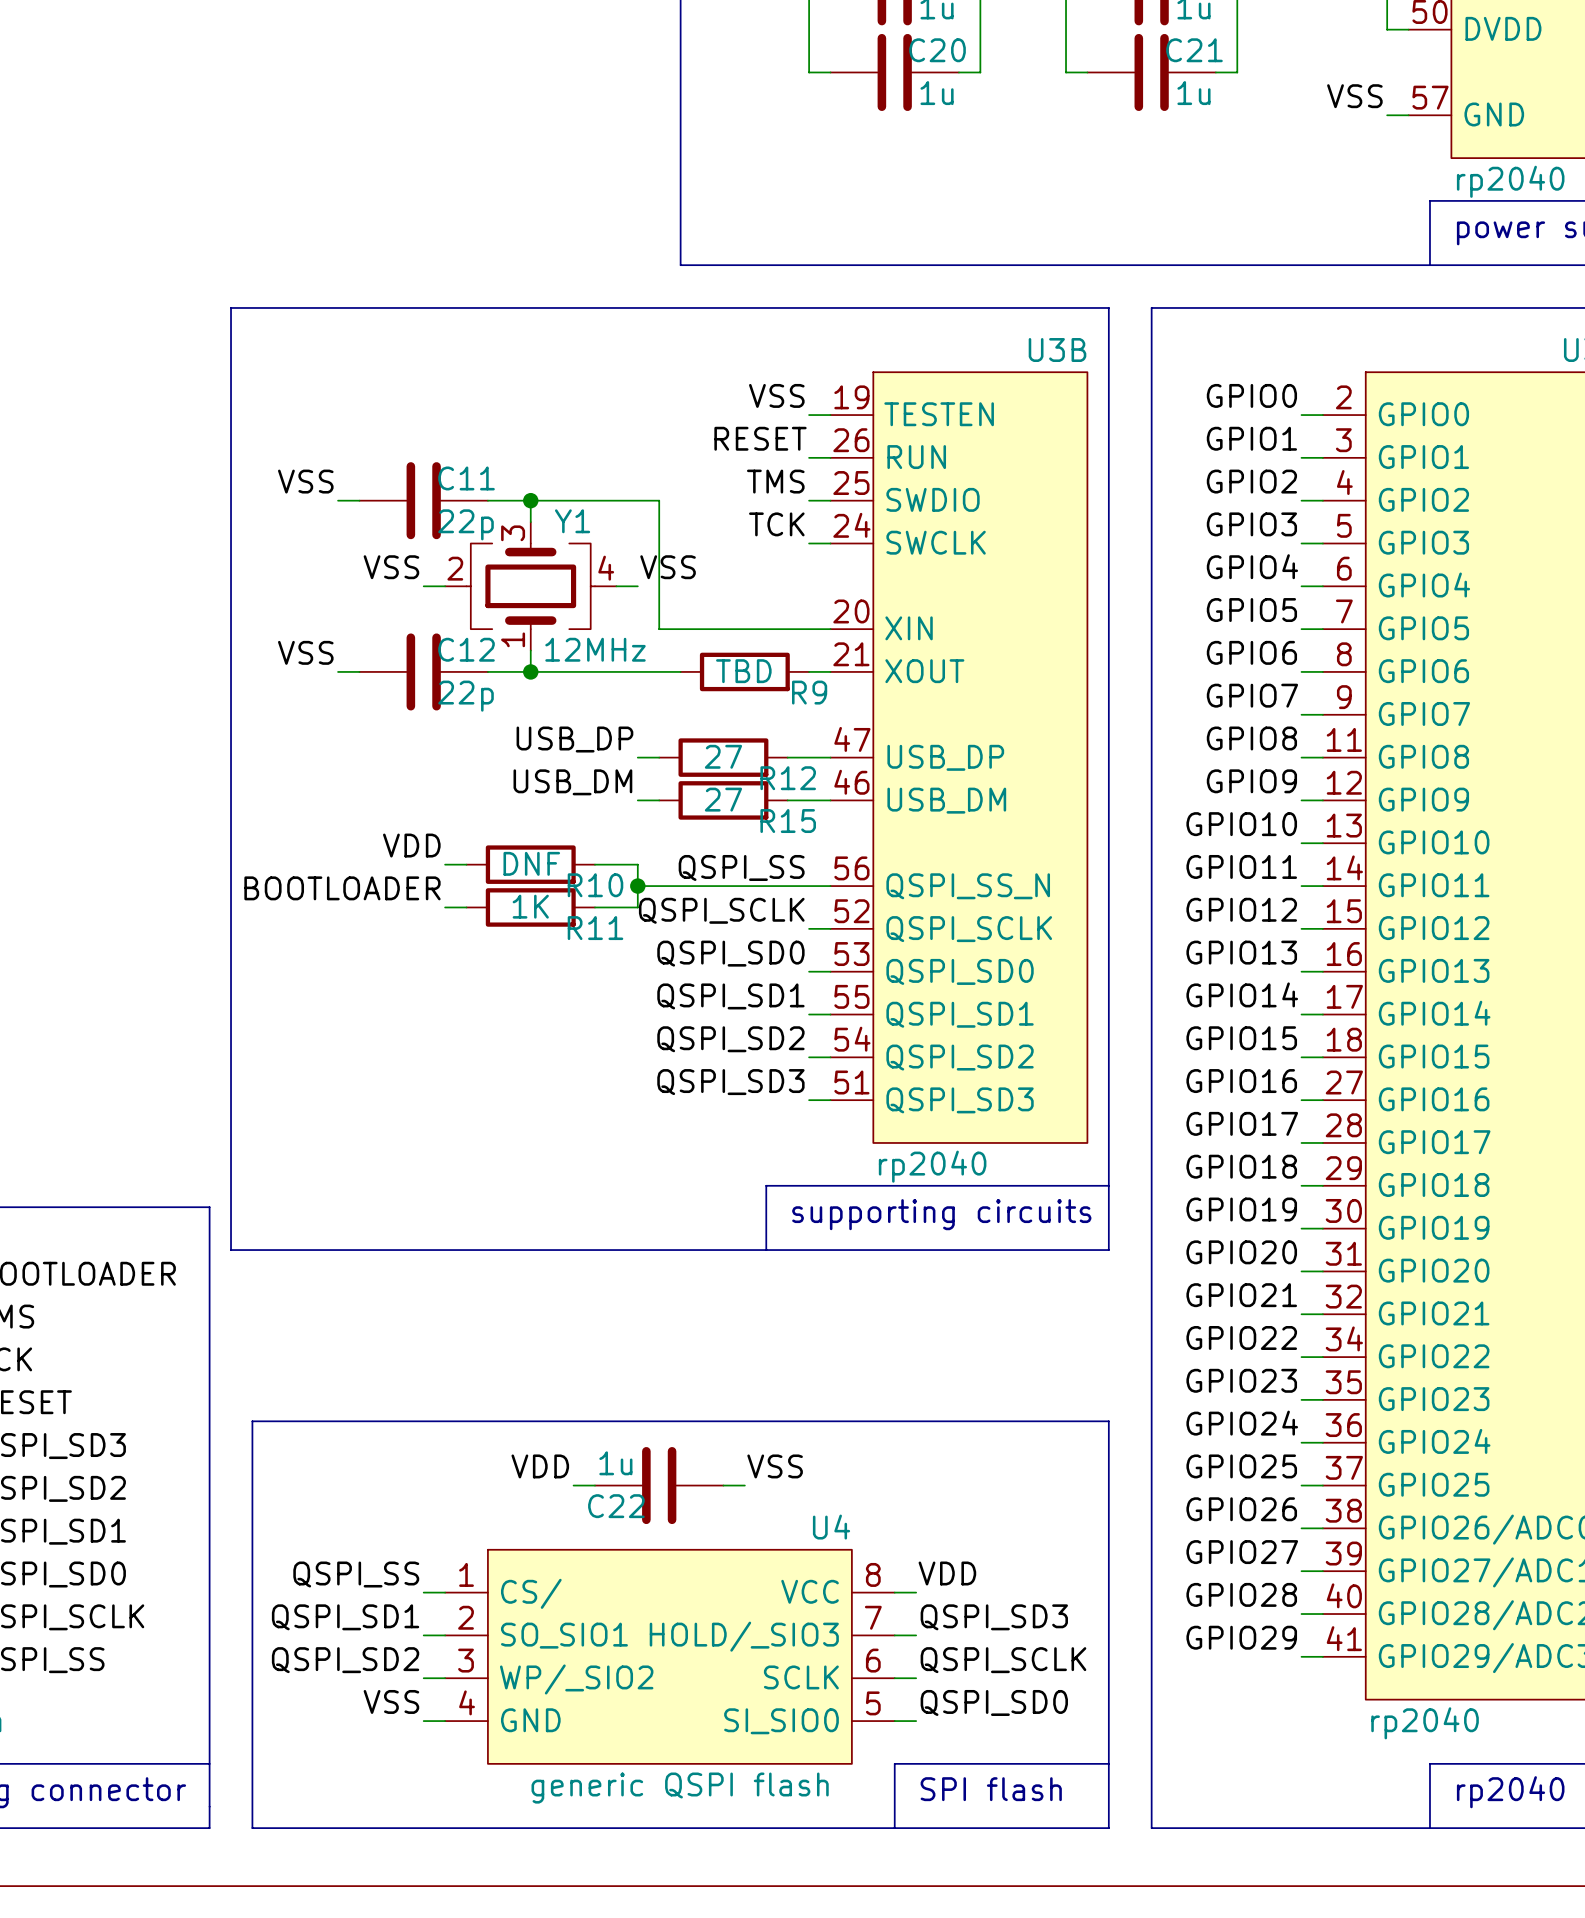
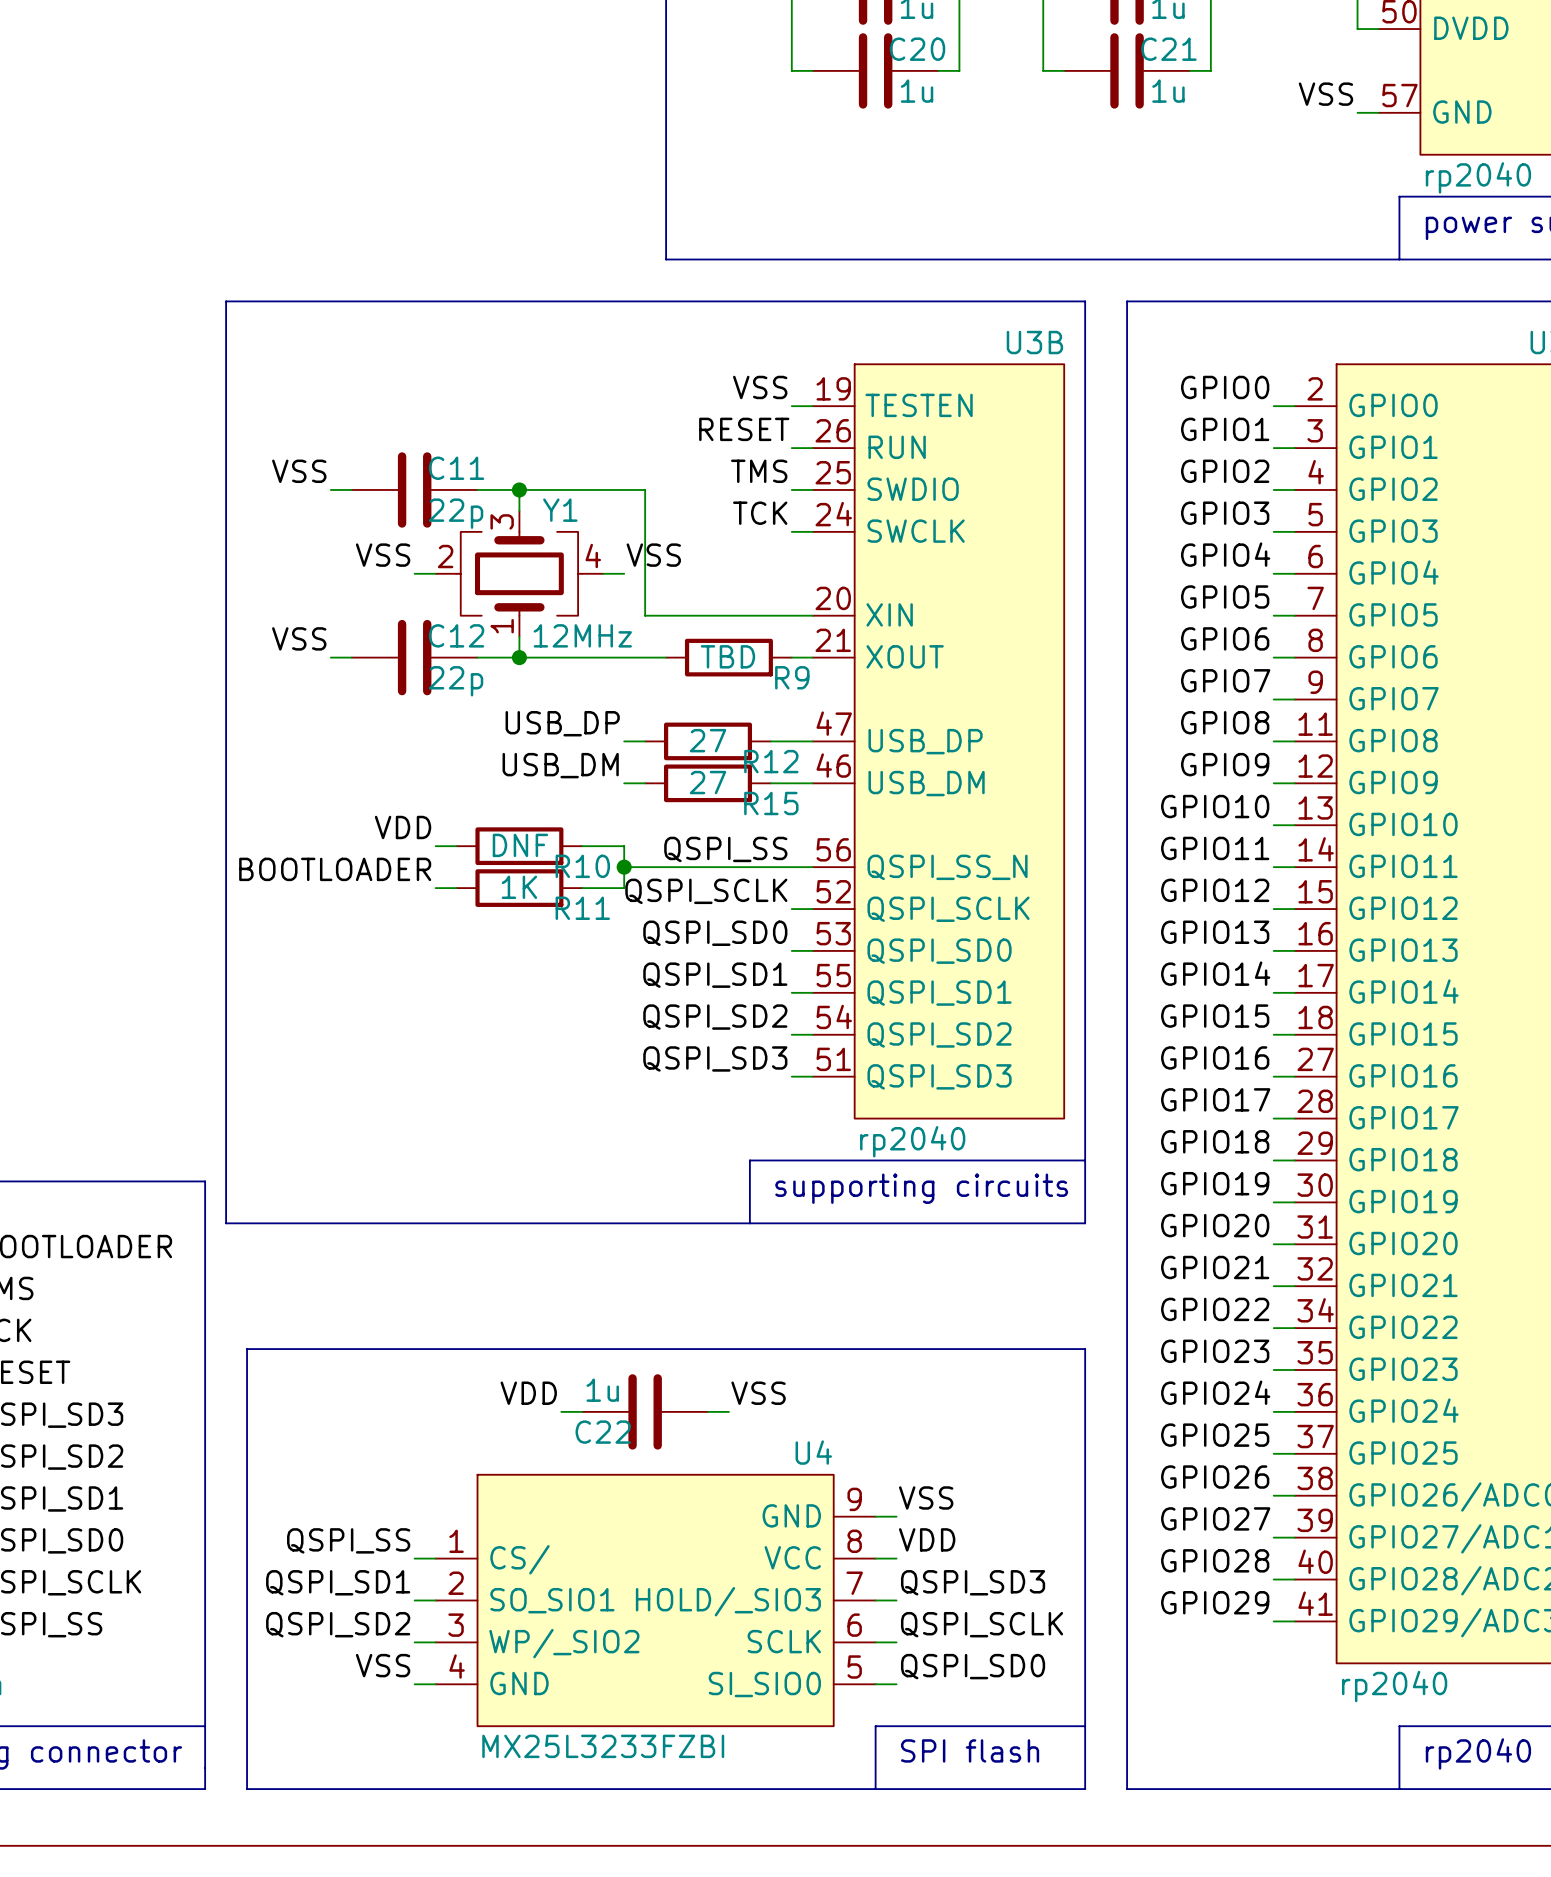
line: (252, 1421) (1108, 1421) -> (247, 1390) (247, 1349) (1085, 1349) (1085, 1390)
label position: VDD (540, 1466) -> VDD (528, 1393)
label position: VSS (775, 1466) -> VSS (758, 1393)
wire: (573, 1485) (594, 1485) -> (561, 1411) (582, 1411)
C22 position: (659, 1485) -> (645, 1411)
wire: (723, 1485) (744, 1485) -> (707, 1411) (728, 1411)
label: none -> VSS (926, 1497)
U4 symbol: [445, 1549, 895, 1764] -> [435, 1474, 876, 1727]
wire: none -> (875, 1516) (896, 1516)
U4 value: generic QSPI flash (680, 1788) -> MX25L3233FZBI (603, 1746)

